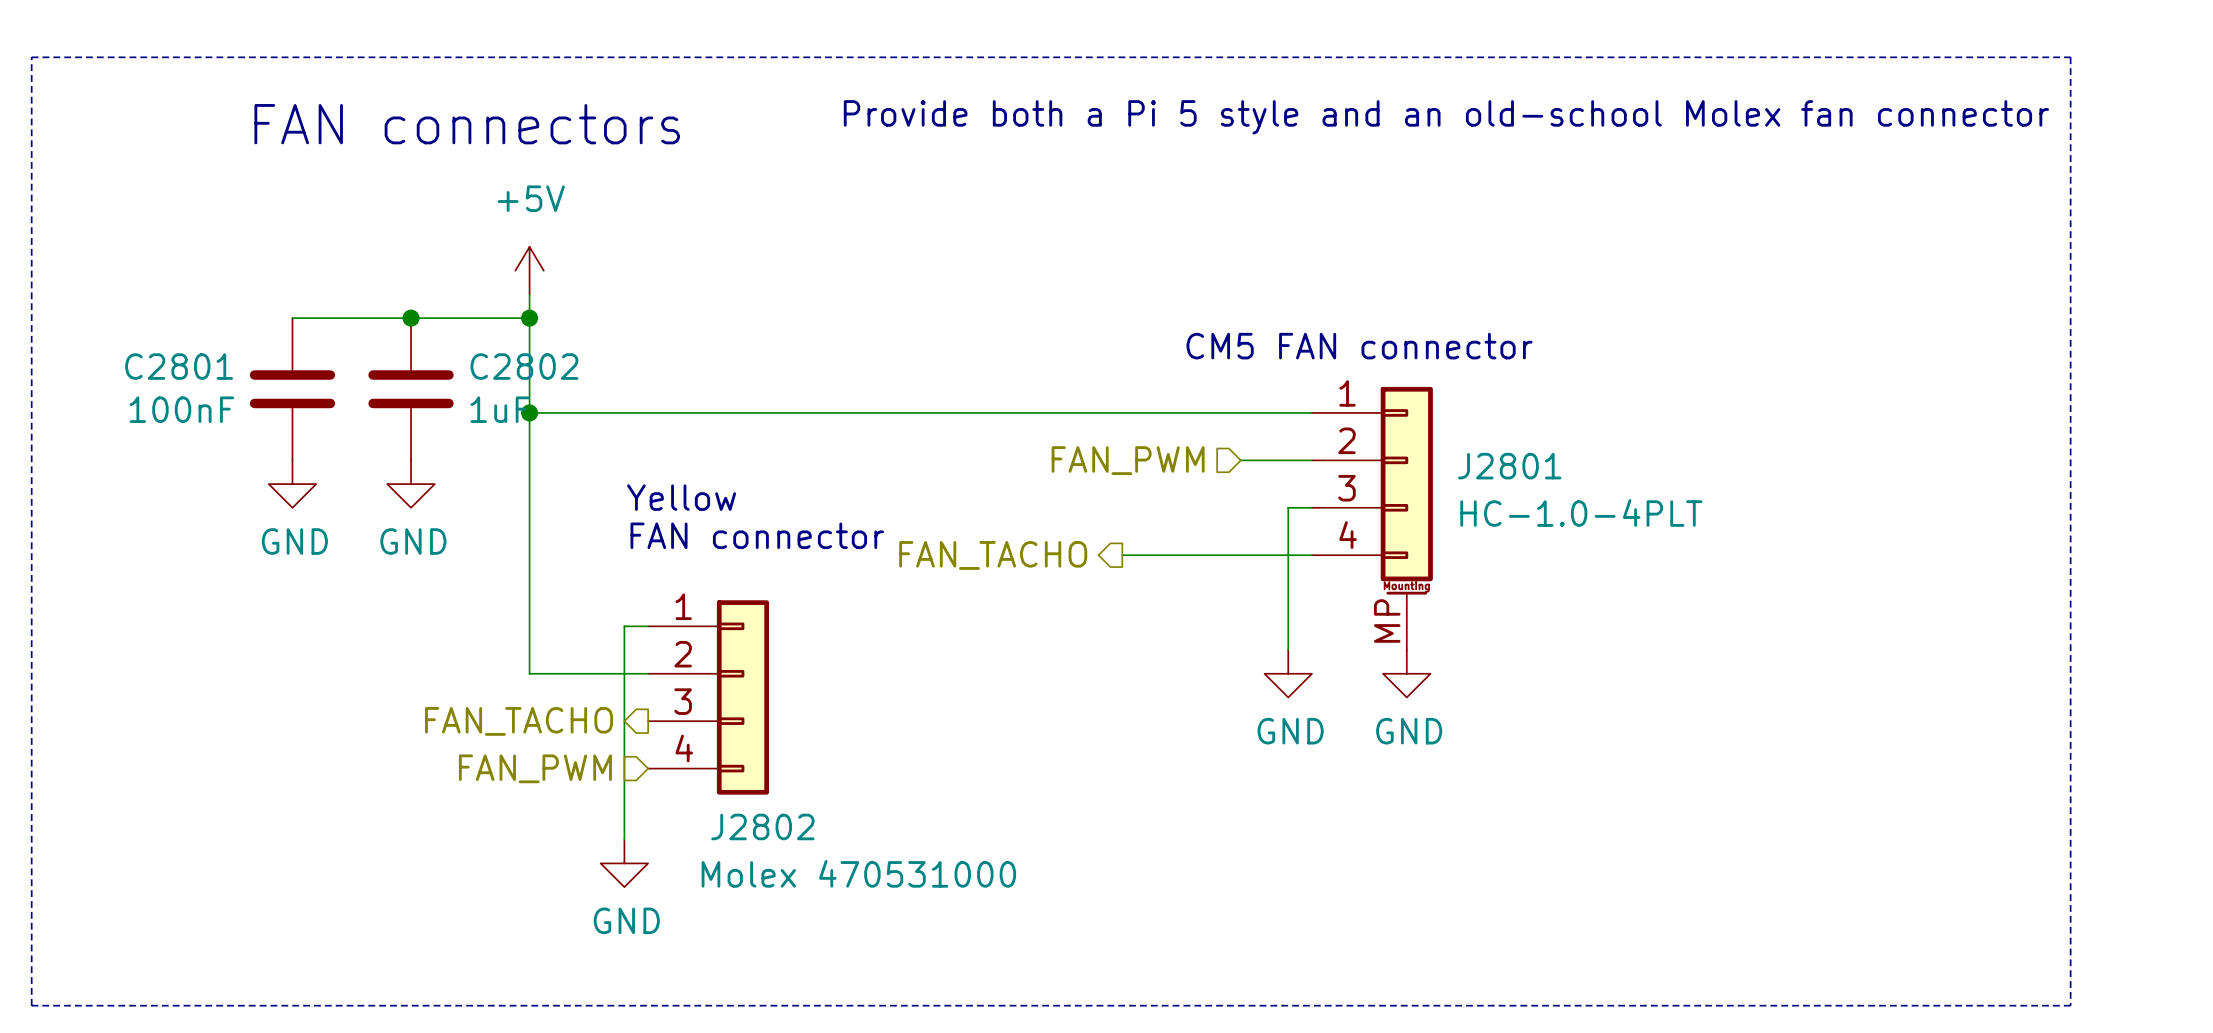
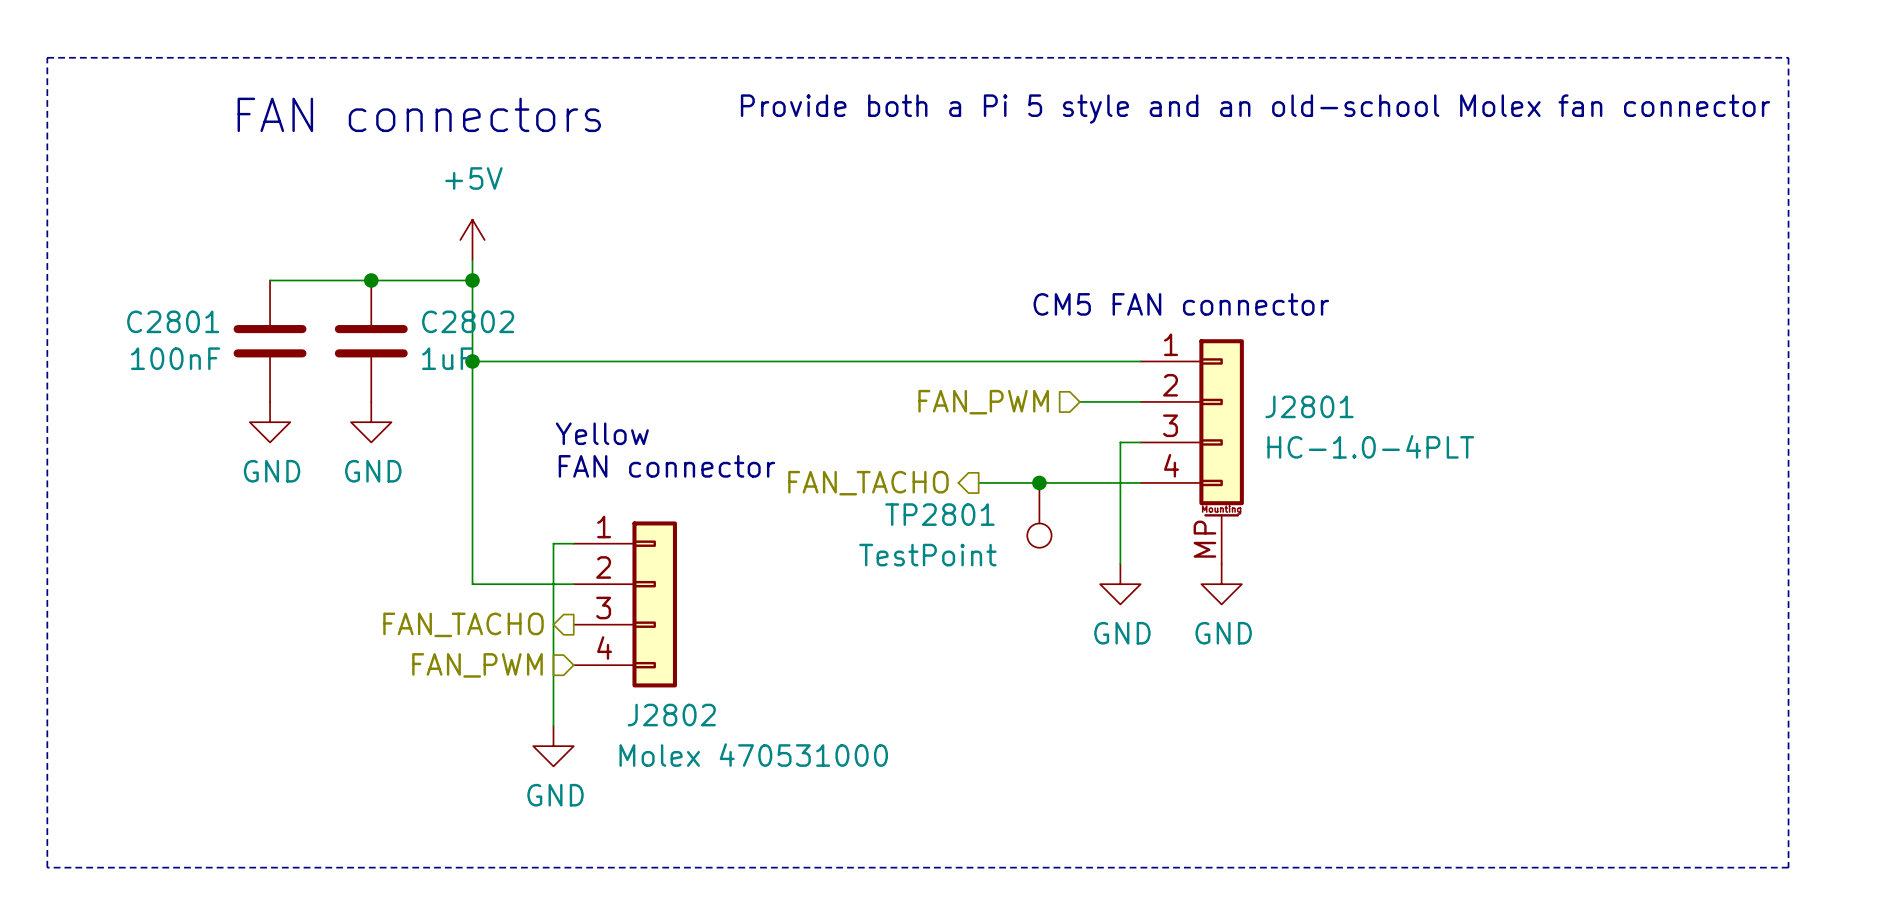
junction: none -> (1039, 482)
TP2801: none -> TestPoint (1039, 515)

